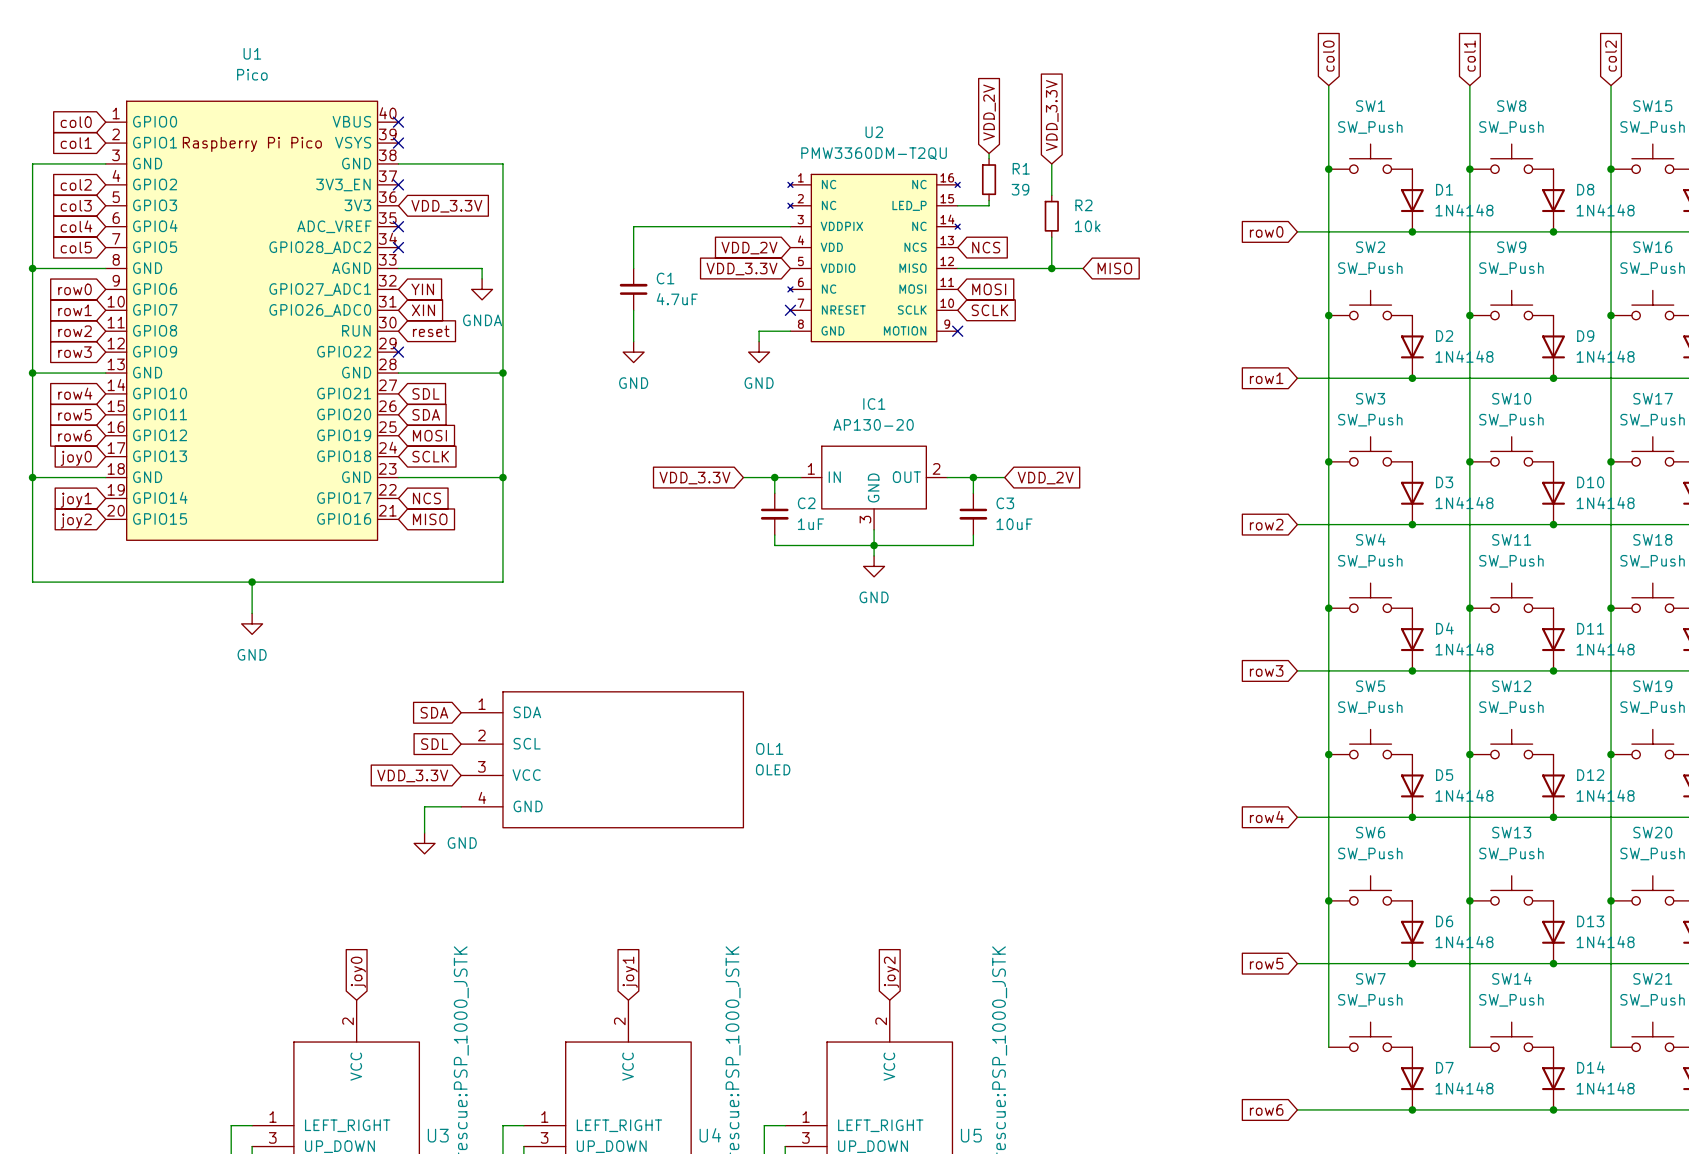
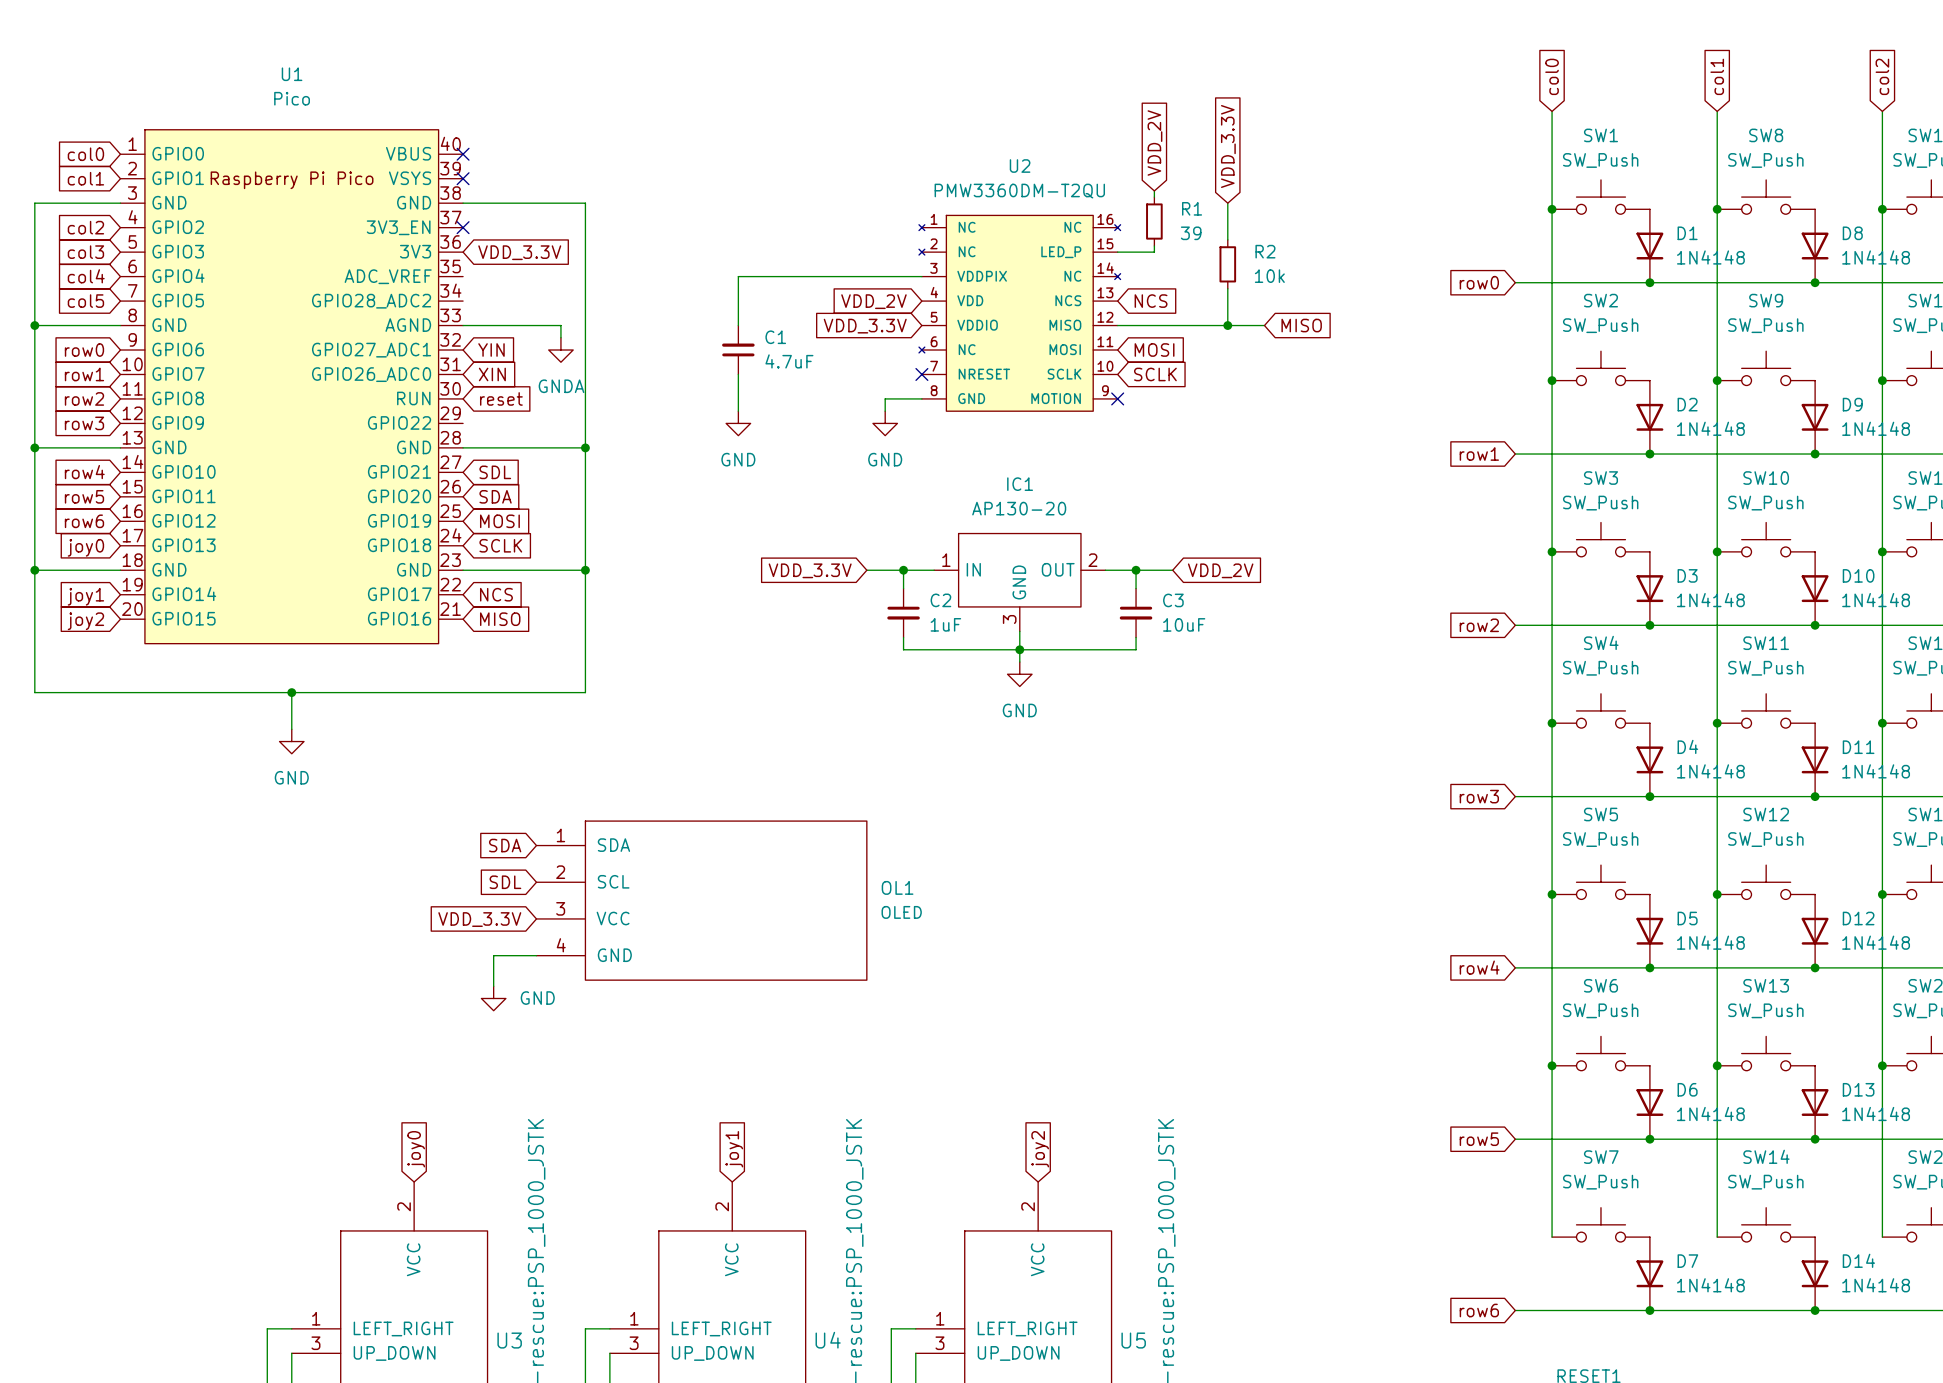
no-connect mark: (398, 226) -> none
no-connect mark: (398, 247) -> none
no-connect mark: (398, 352) -> none

